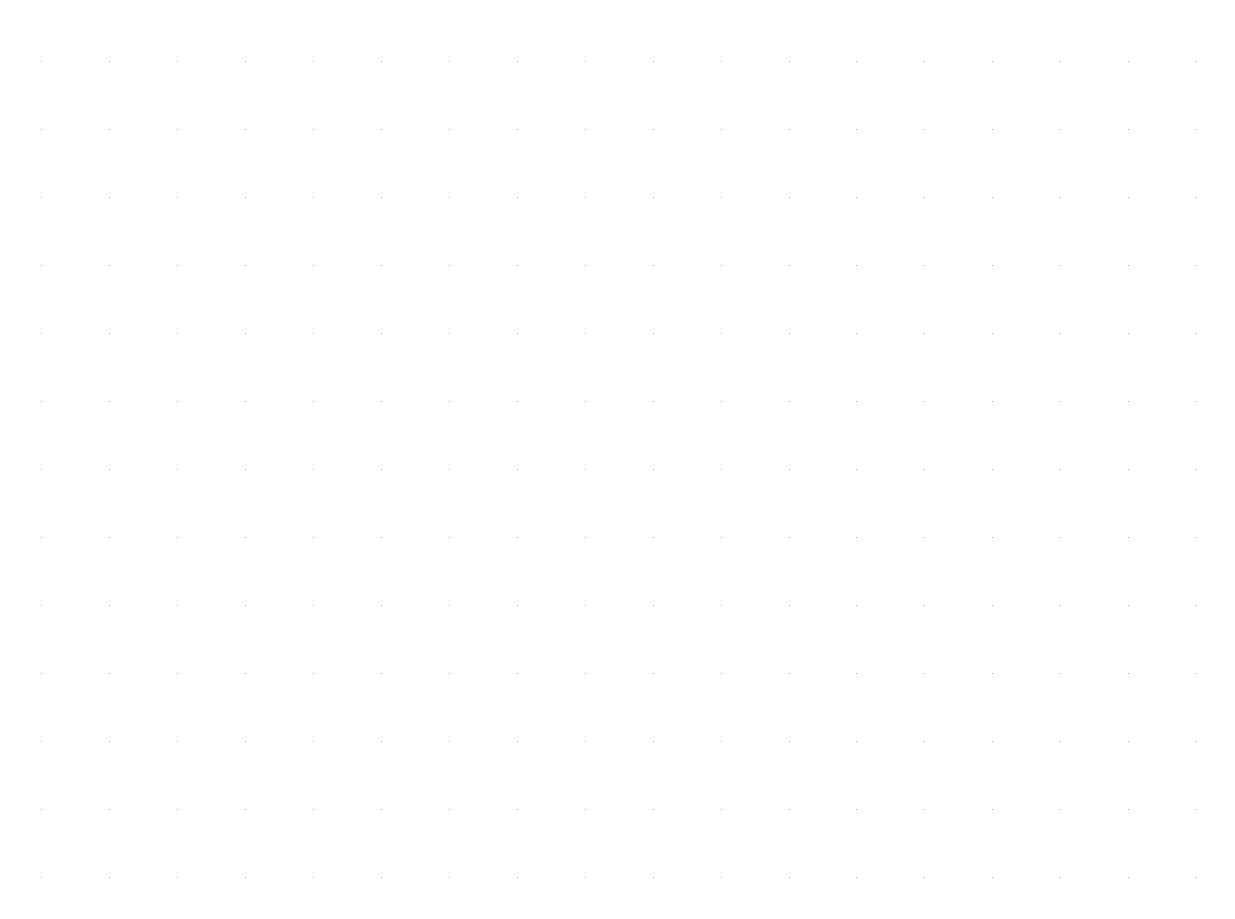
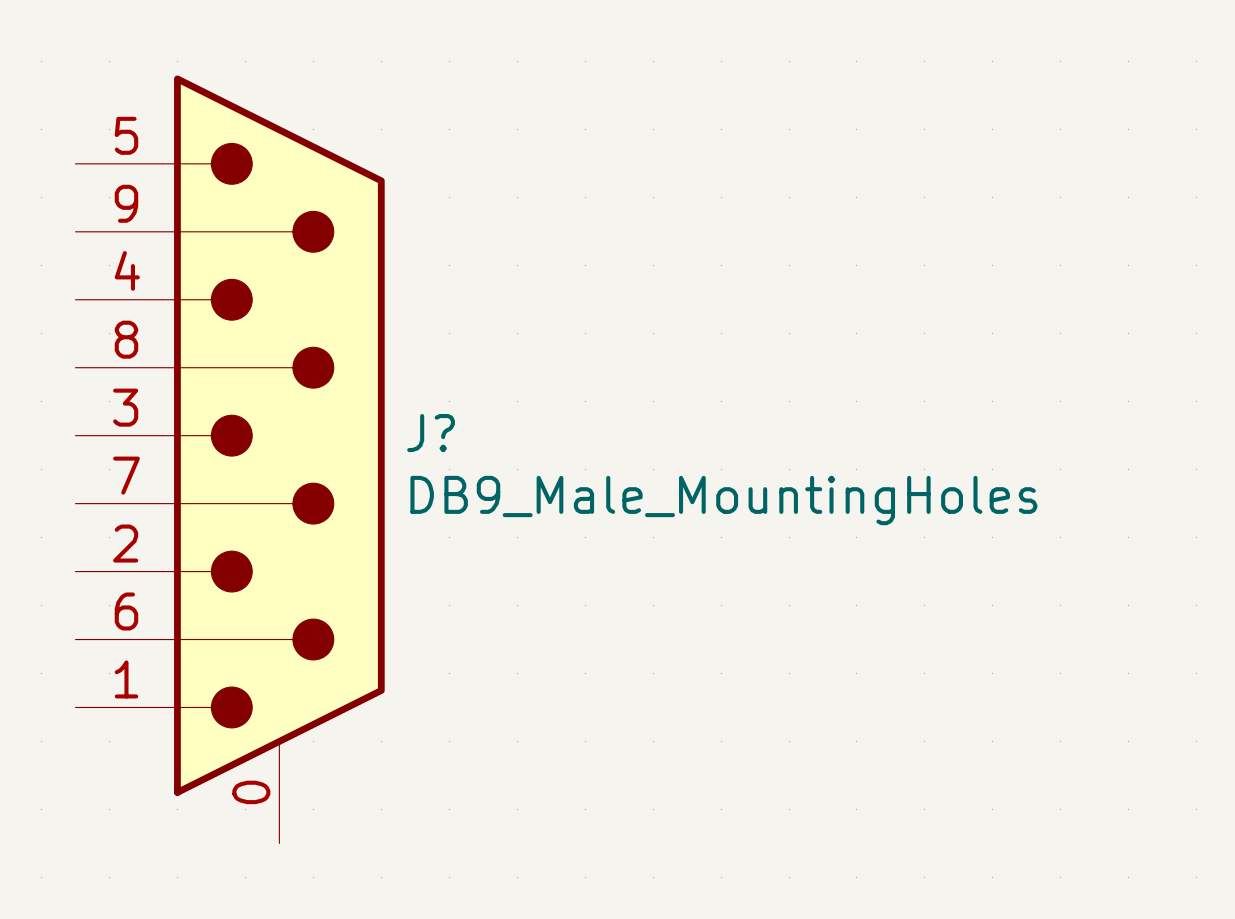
J?: none -> DB9_Male_MountingHoles (230, 459)

